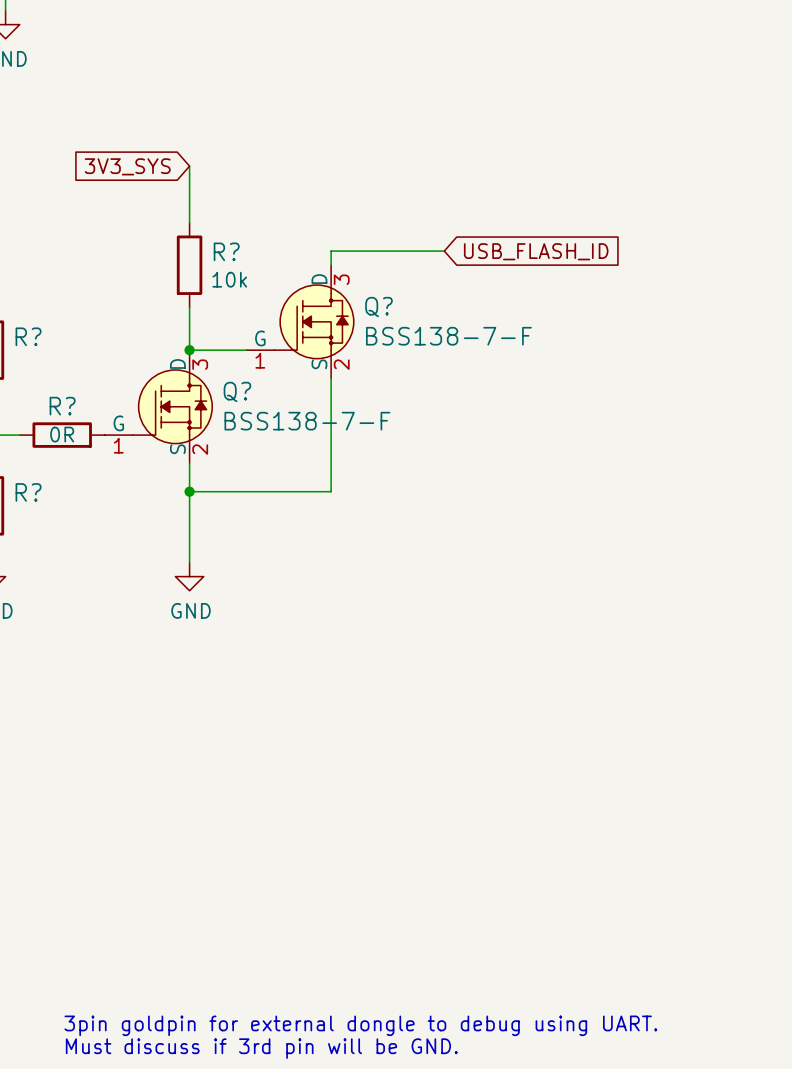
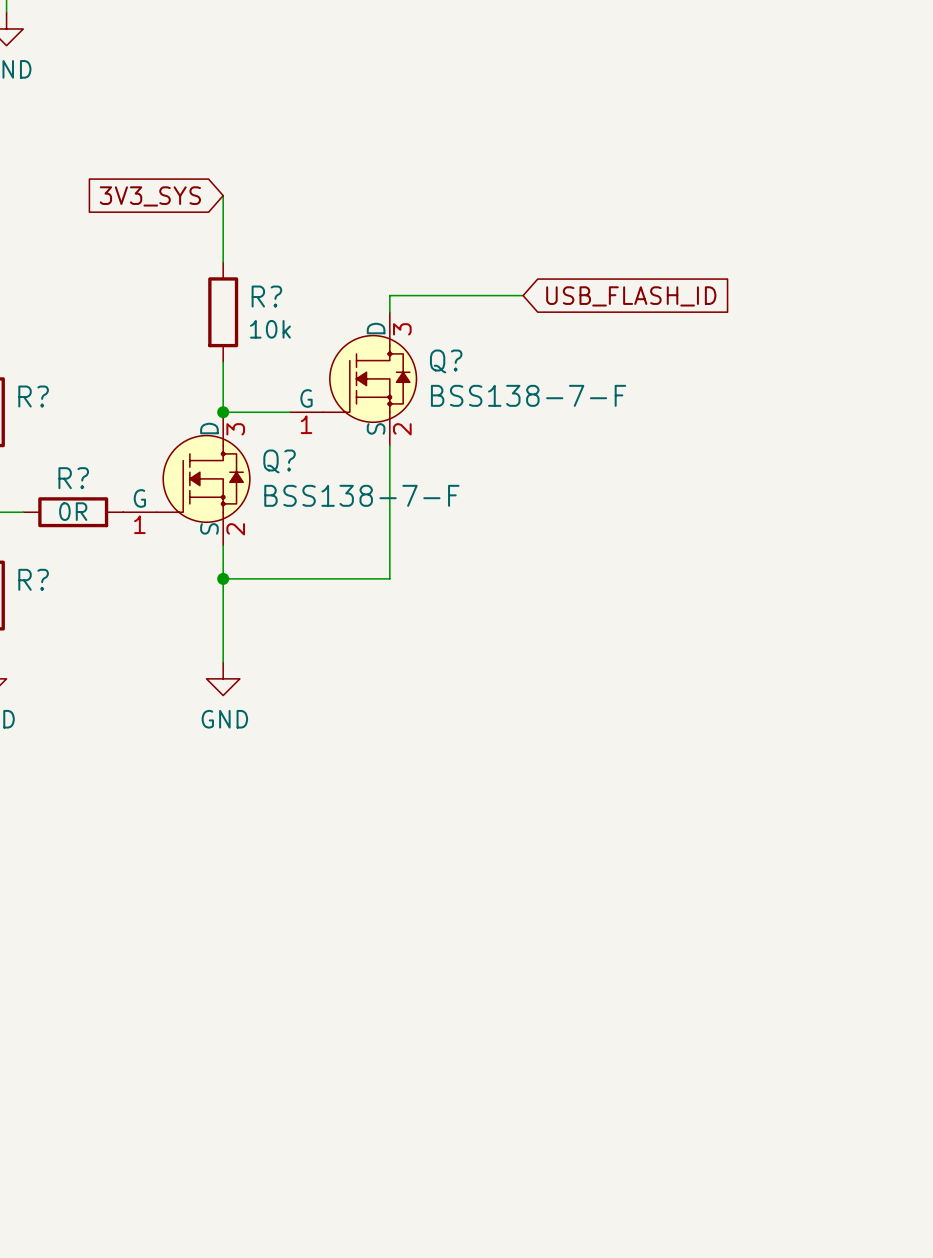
text: 3pin goldpin for external dongle to debug using UART. (360, 1025) -> none
text: Must discuss if 3rd pin will be GND. (261, 1048) -> none

